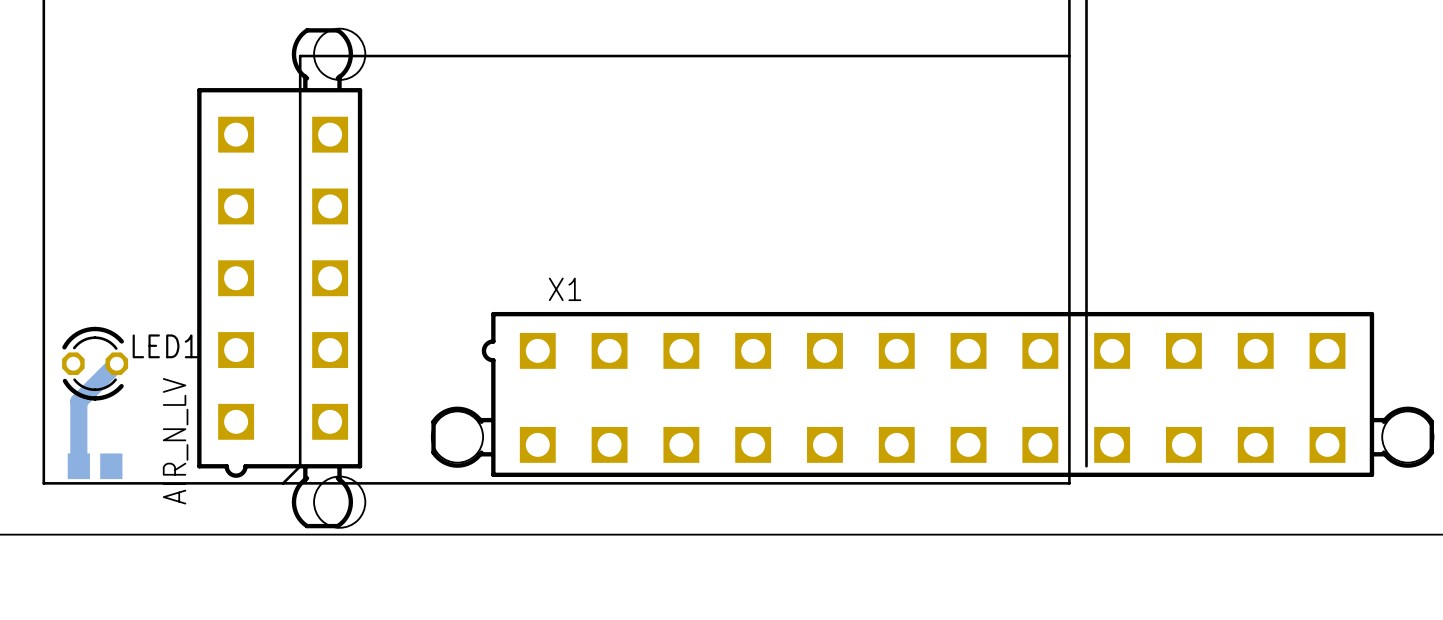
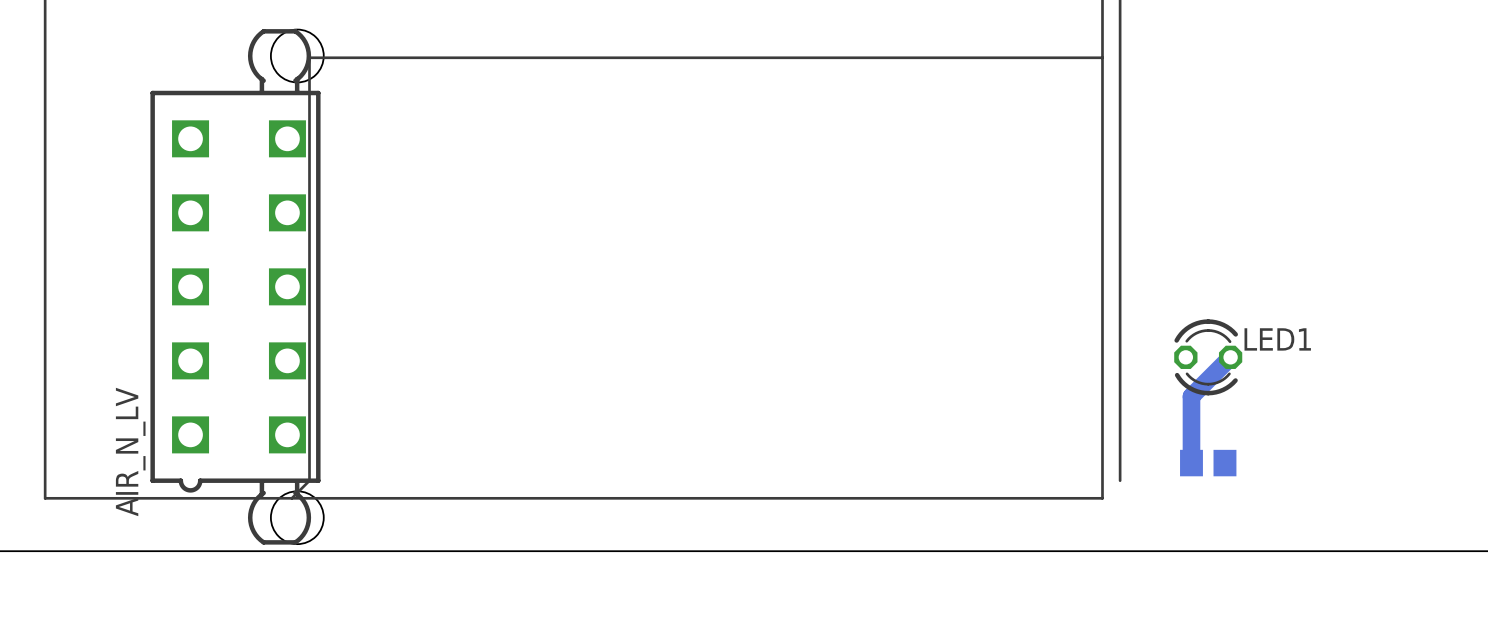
AIR_N_LV position: (281, 278) -> (237, 286)
bottom track: none -> (1230, 357) (1191, 396) (1191, 463)
LED1 position: (95, 363) -> (1208, 357)
bottom track: (116, 363) (78, 401) (78, 466) -> none
X1: (932, 394) -> none
part: none -> (1208, 463)
part: (95, 466) -> none

